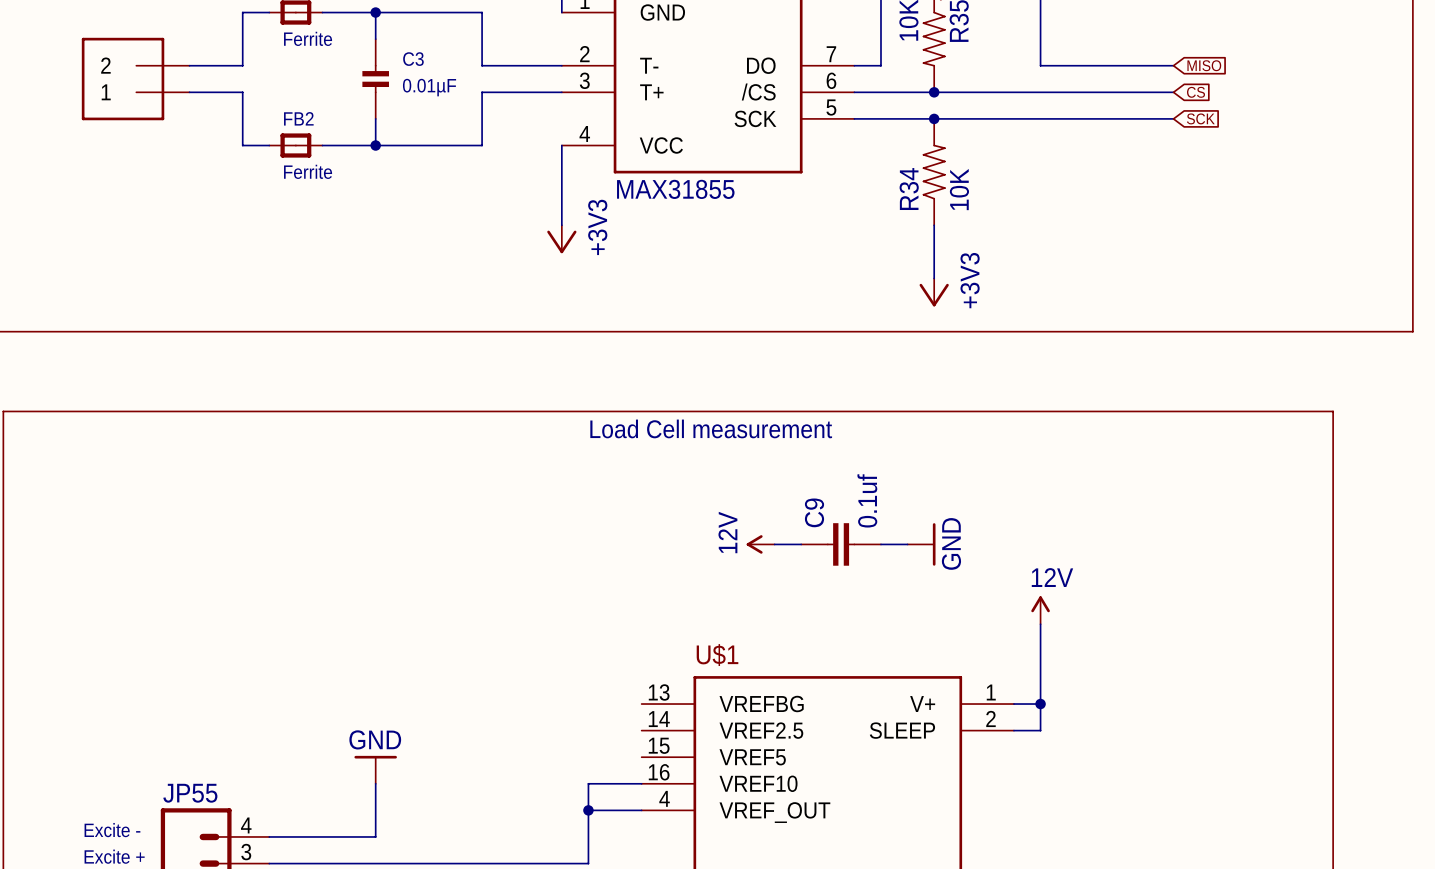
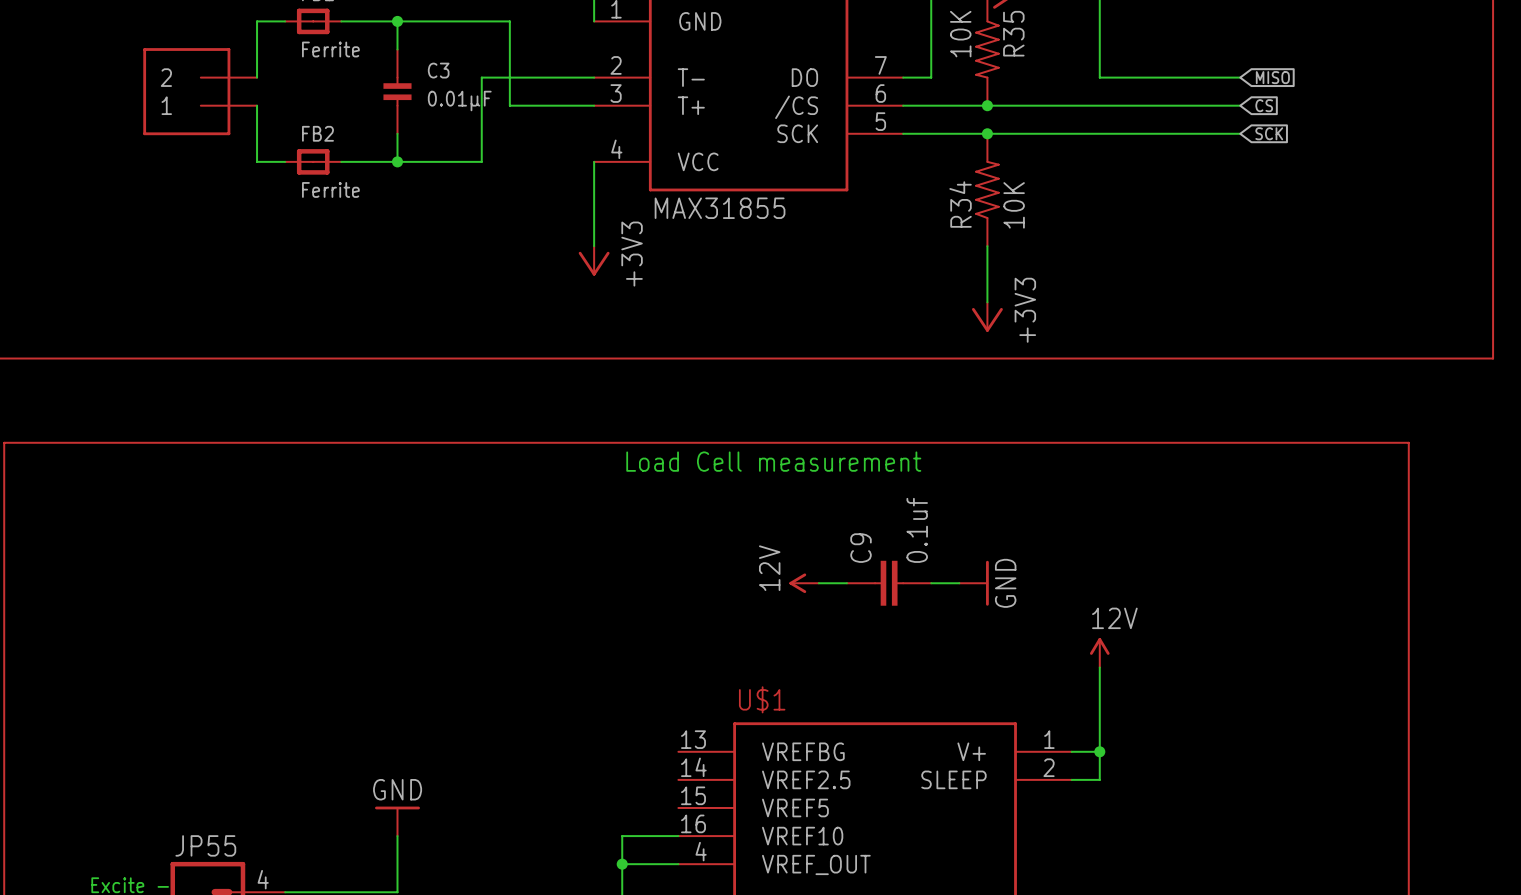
part position: (135, 79) -> (200, 91)
wire: (482, 92) (482, 145) (455, 145) -> (509, 105) (509, 77) (481, 77) (481, 161)

